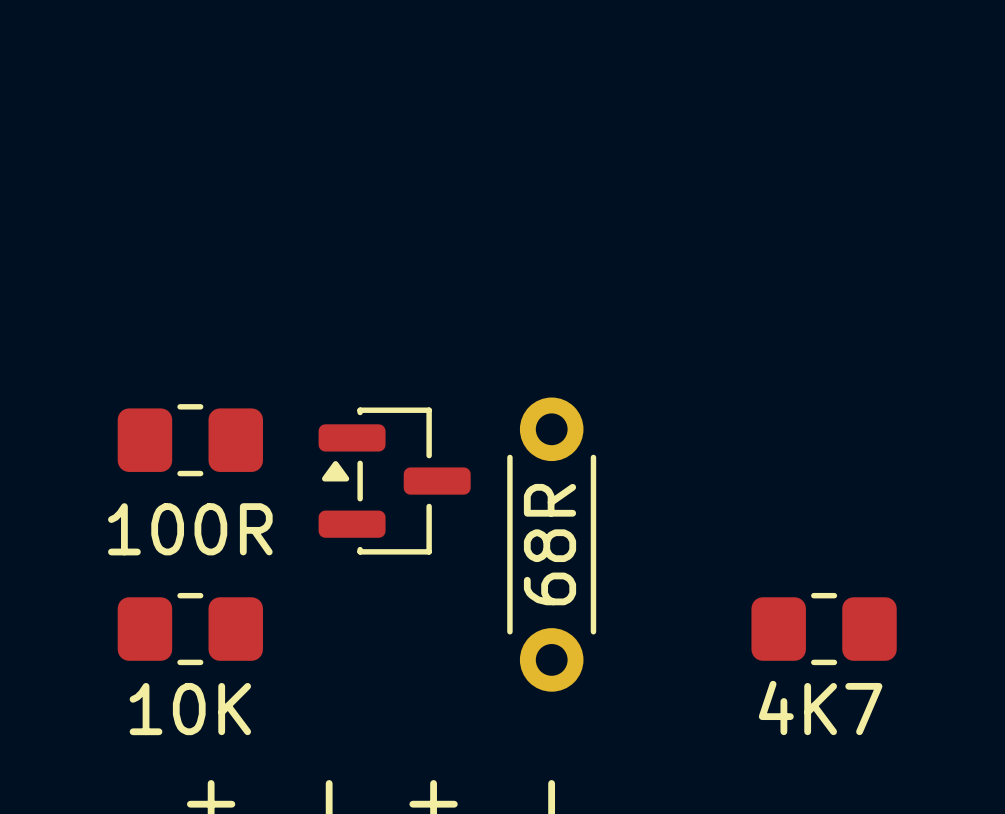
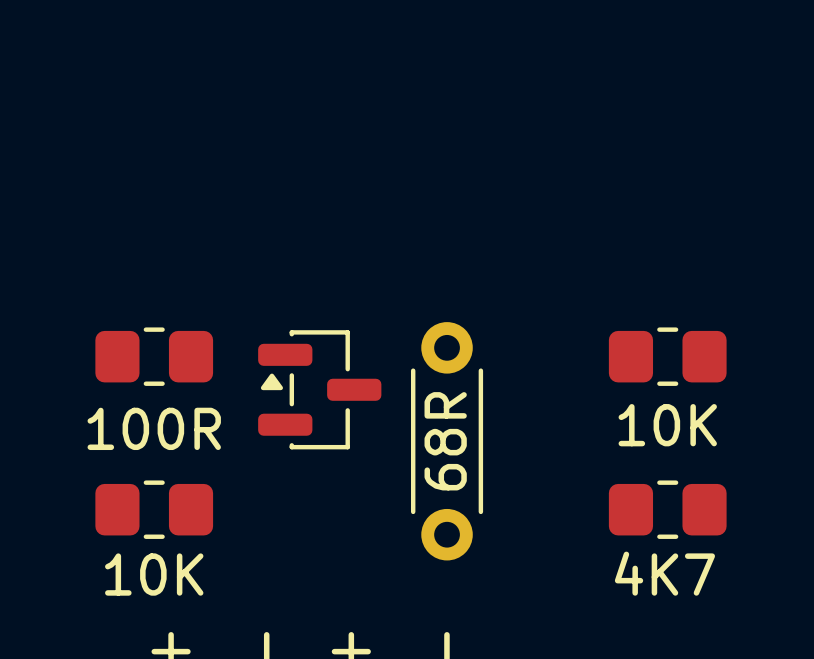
part: none -> 10K (667, 356)

